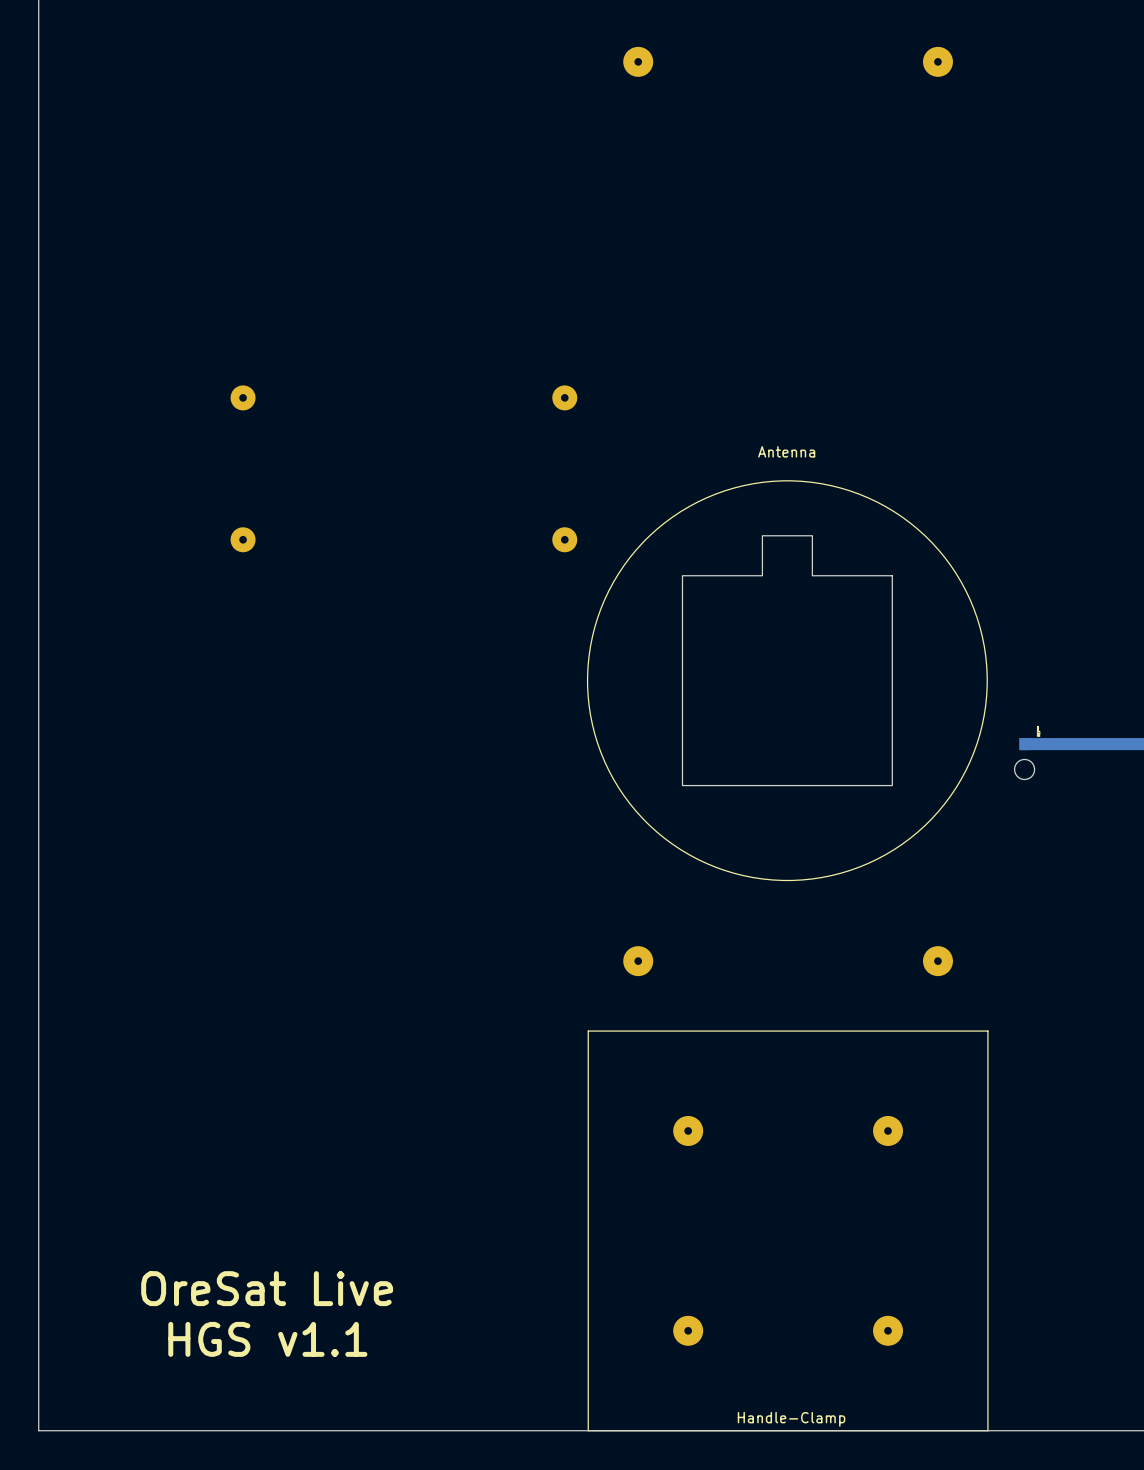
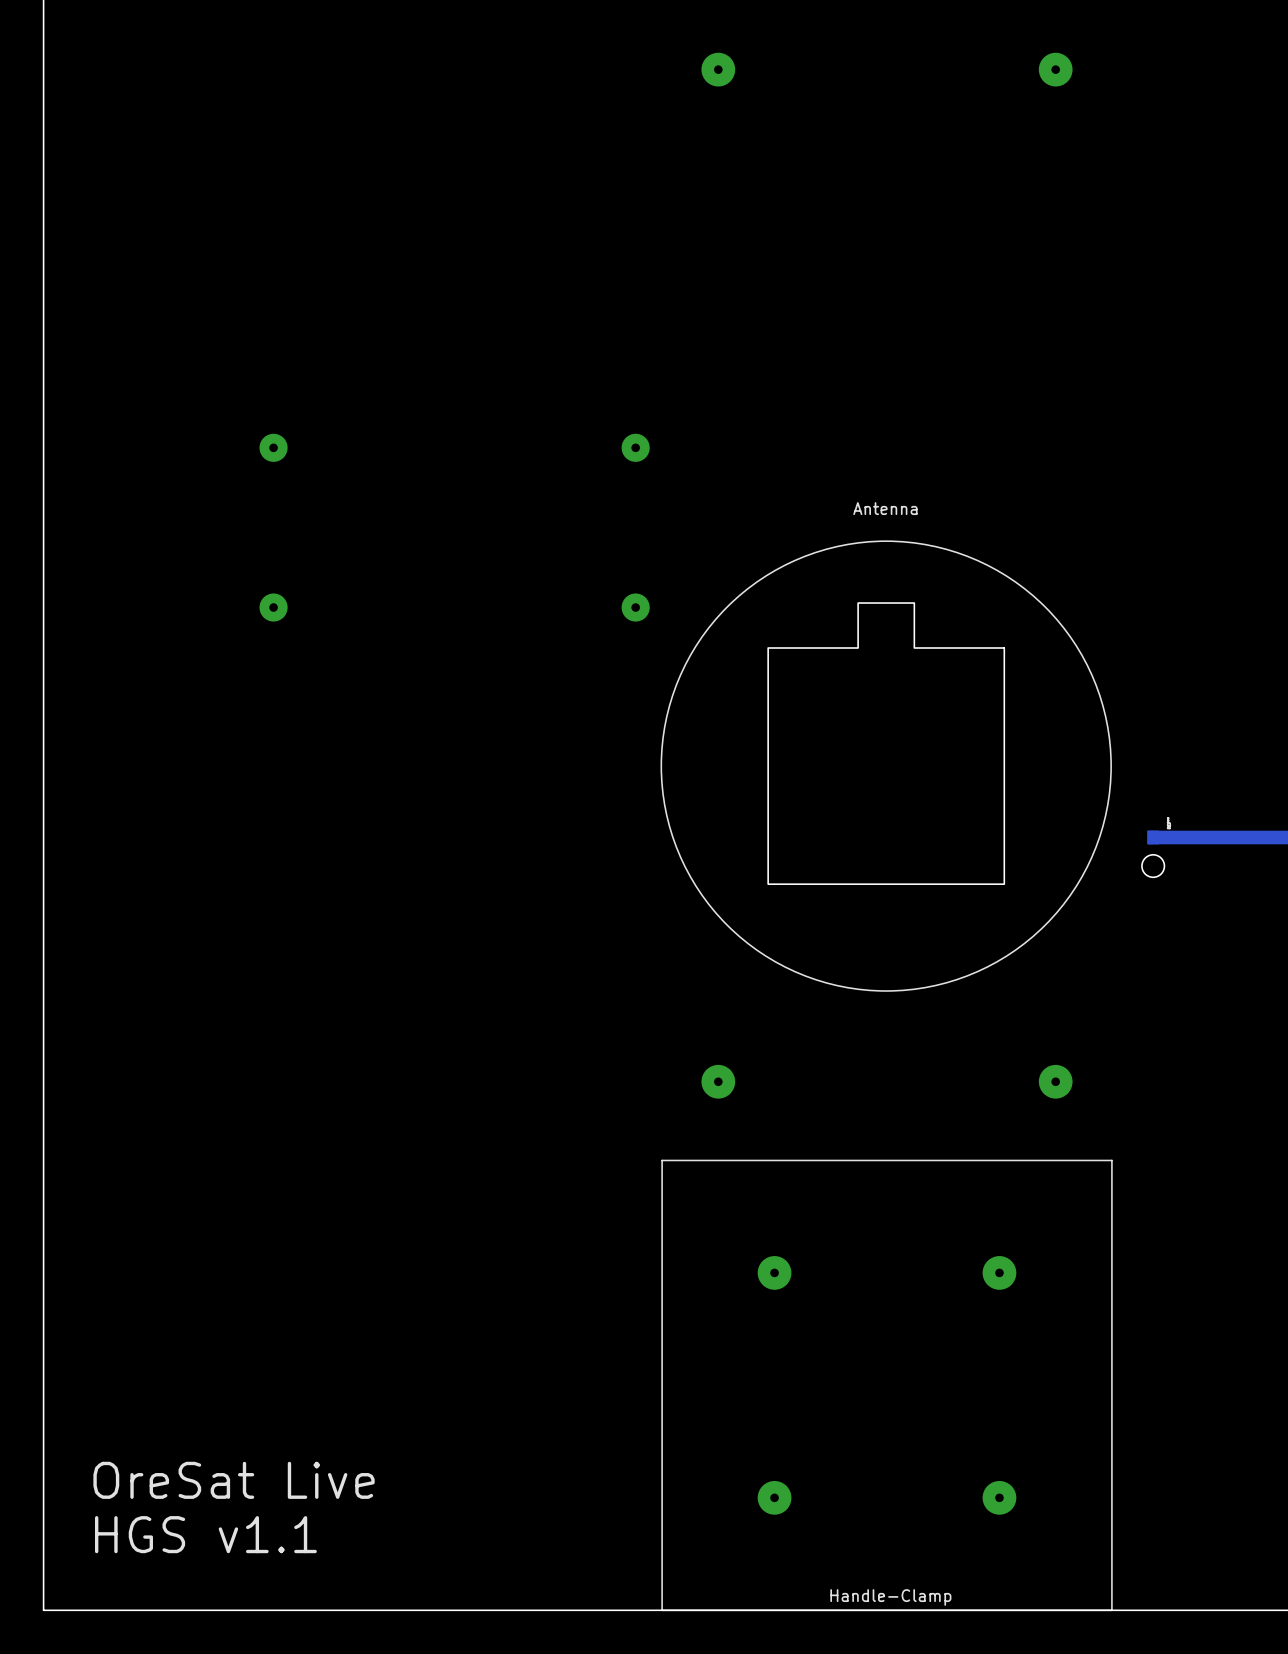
drawing: [141, 1271, 394, 1357] -> none
text: none -> OreSat Live (234, 1480)
text: none -> HGS v1.1 (205, 1534)

